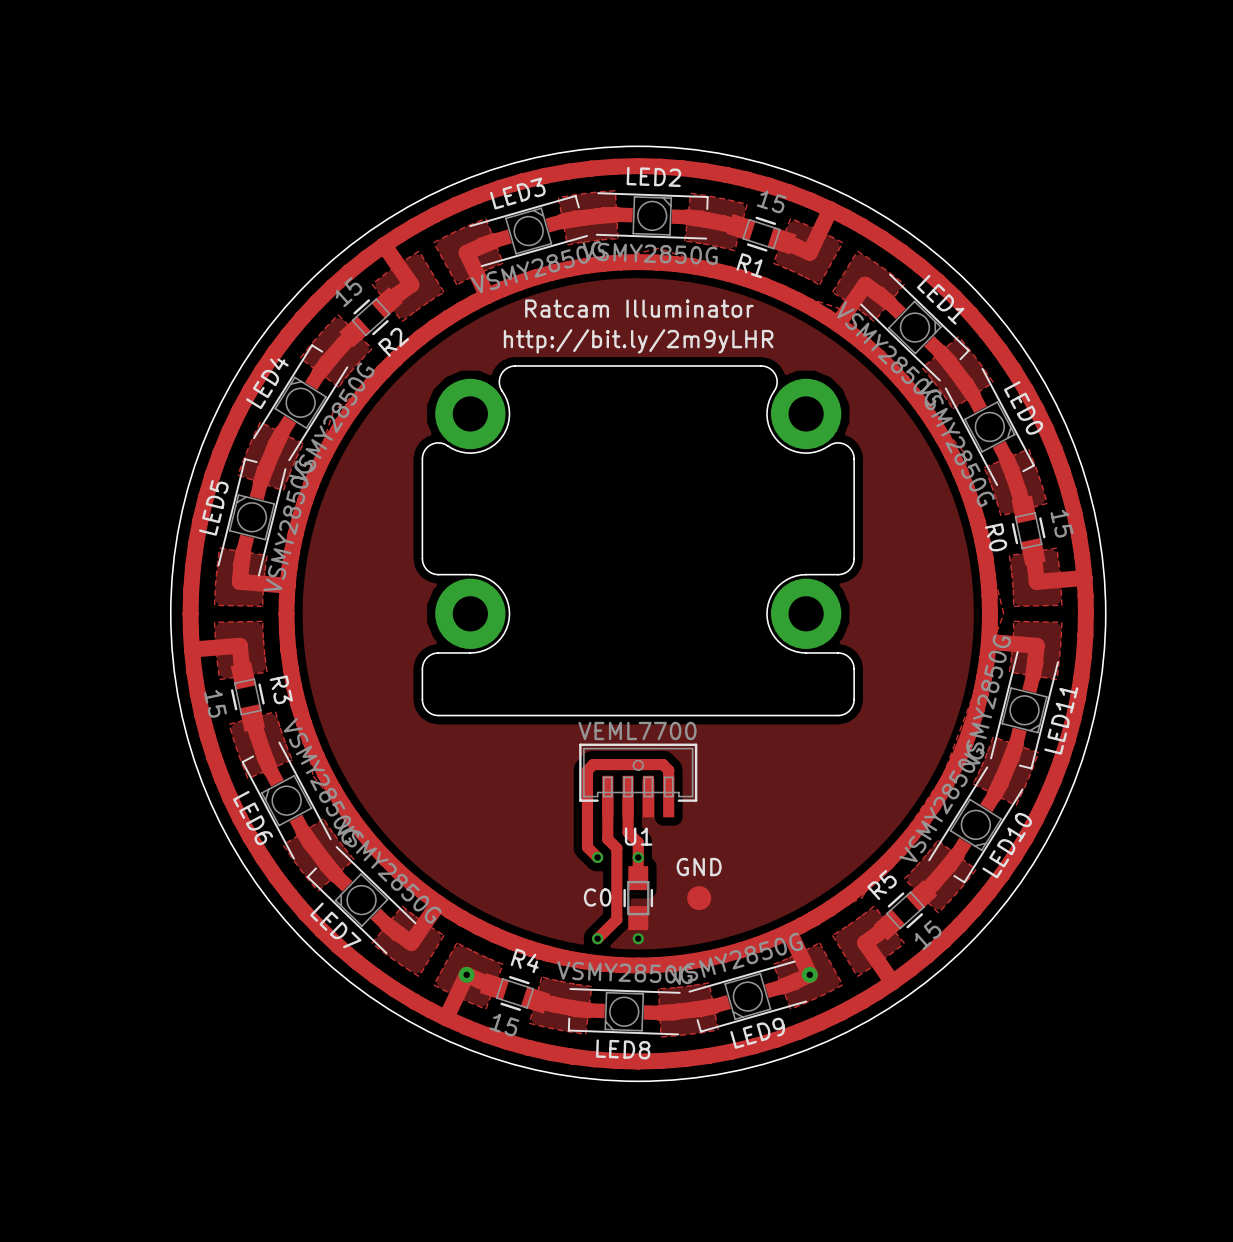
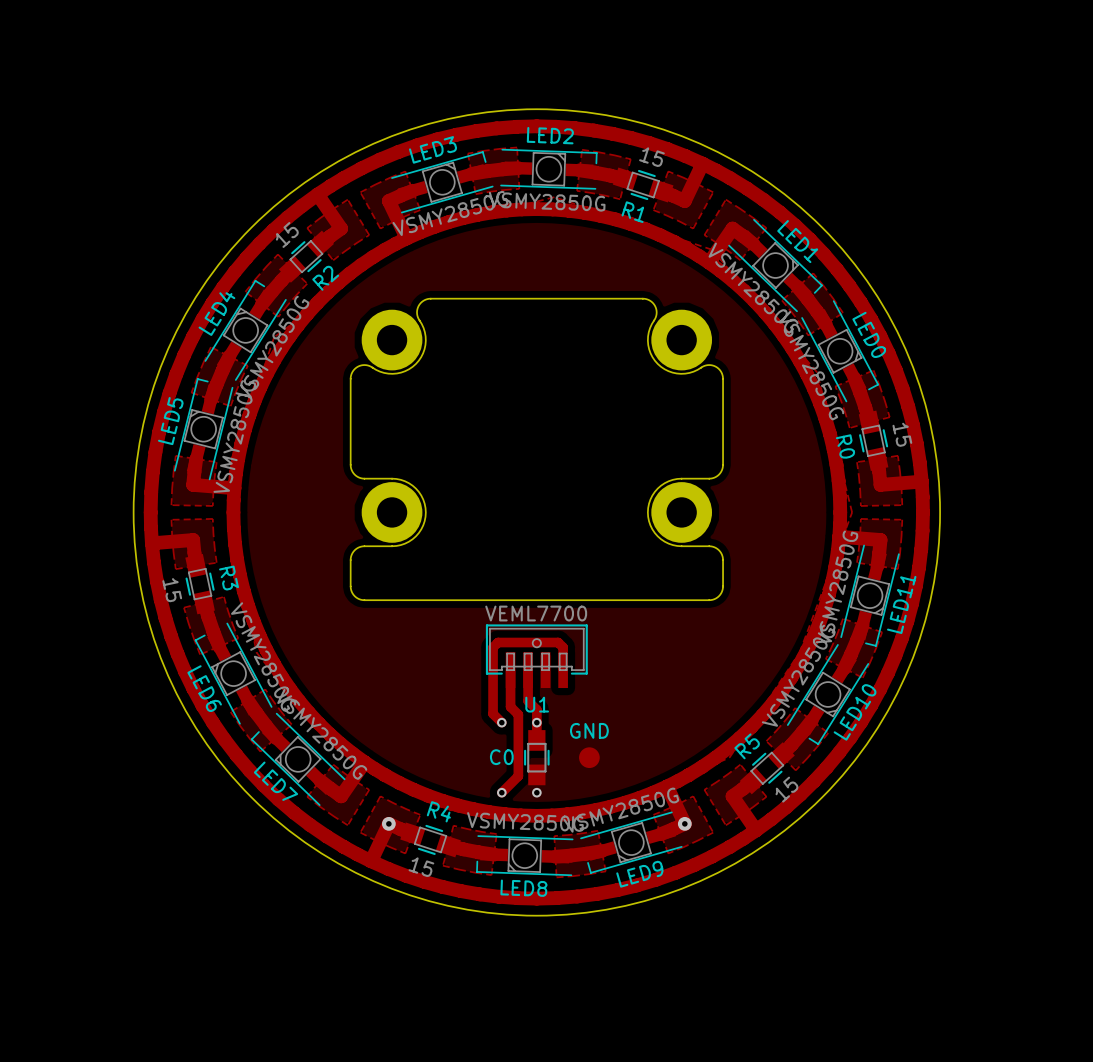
drawing: [525, 299, 754, 318] -> none
text: http://bit.ly/2m9yLHR (638, 341) -> none

